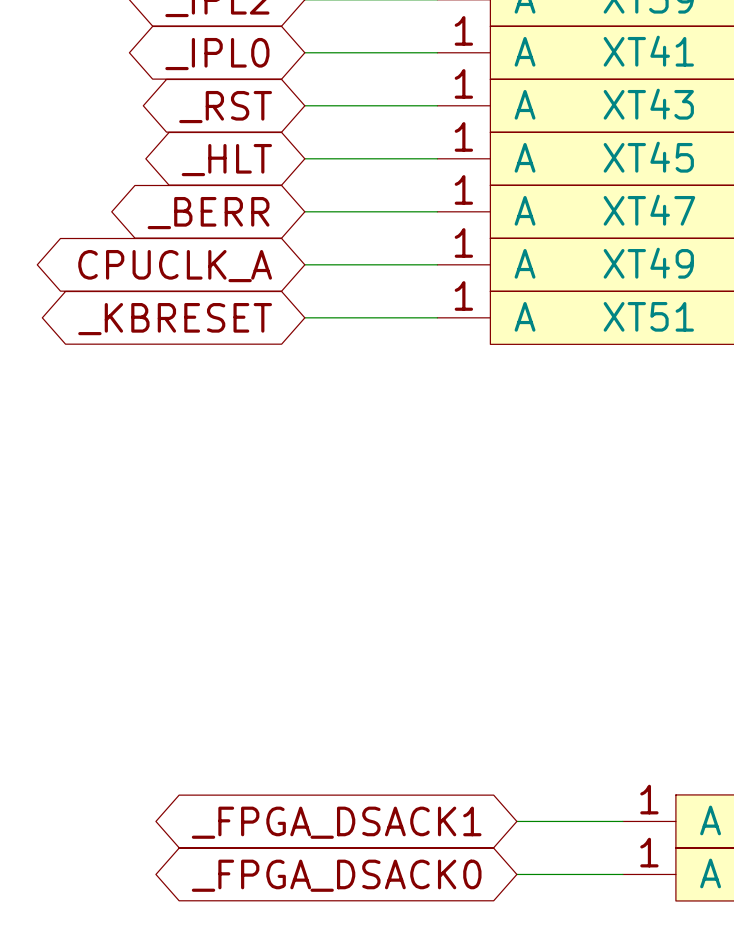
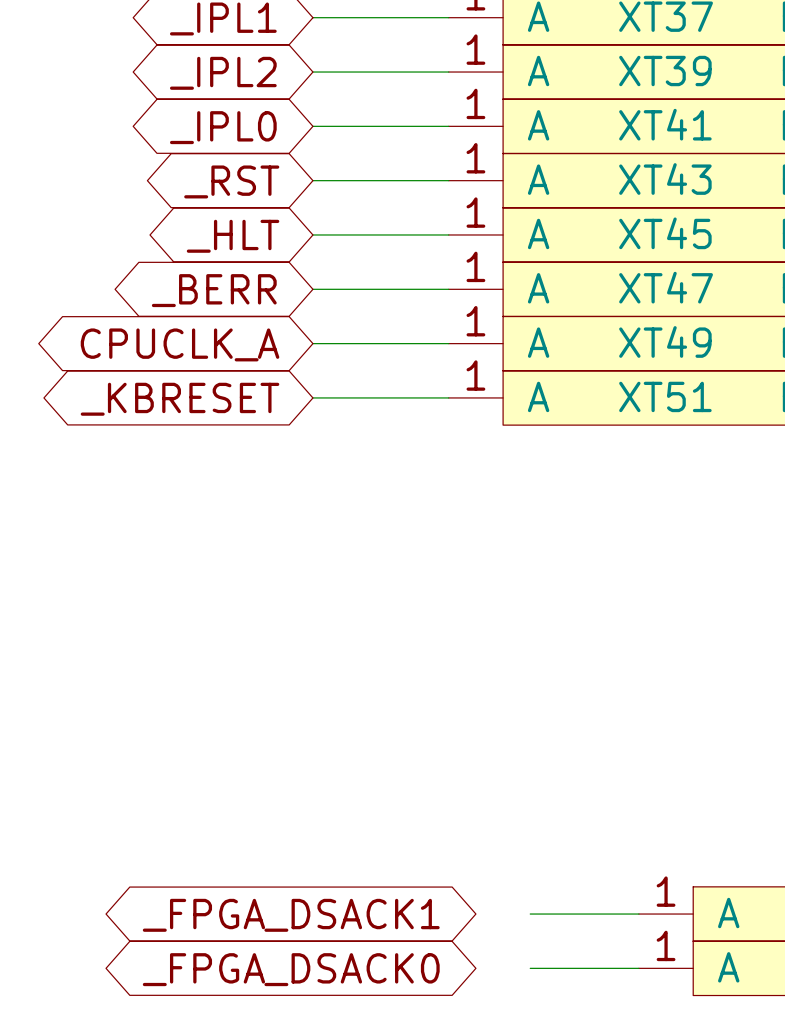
global label position: _FPGA_DSACK1 (336, 822) -> _FPGA_DSACK1 (291, 915)
global label position: _FPGA_DSACK0 (336, 875) -> _FPGA_DSACK0 (291, 969)

